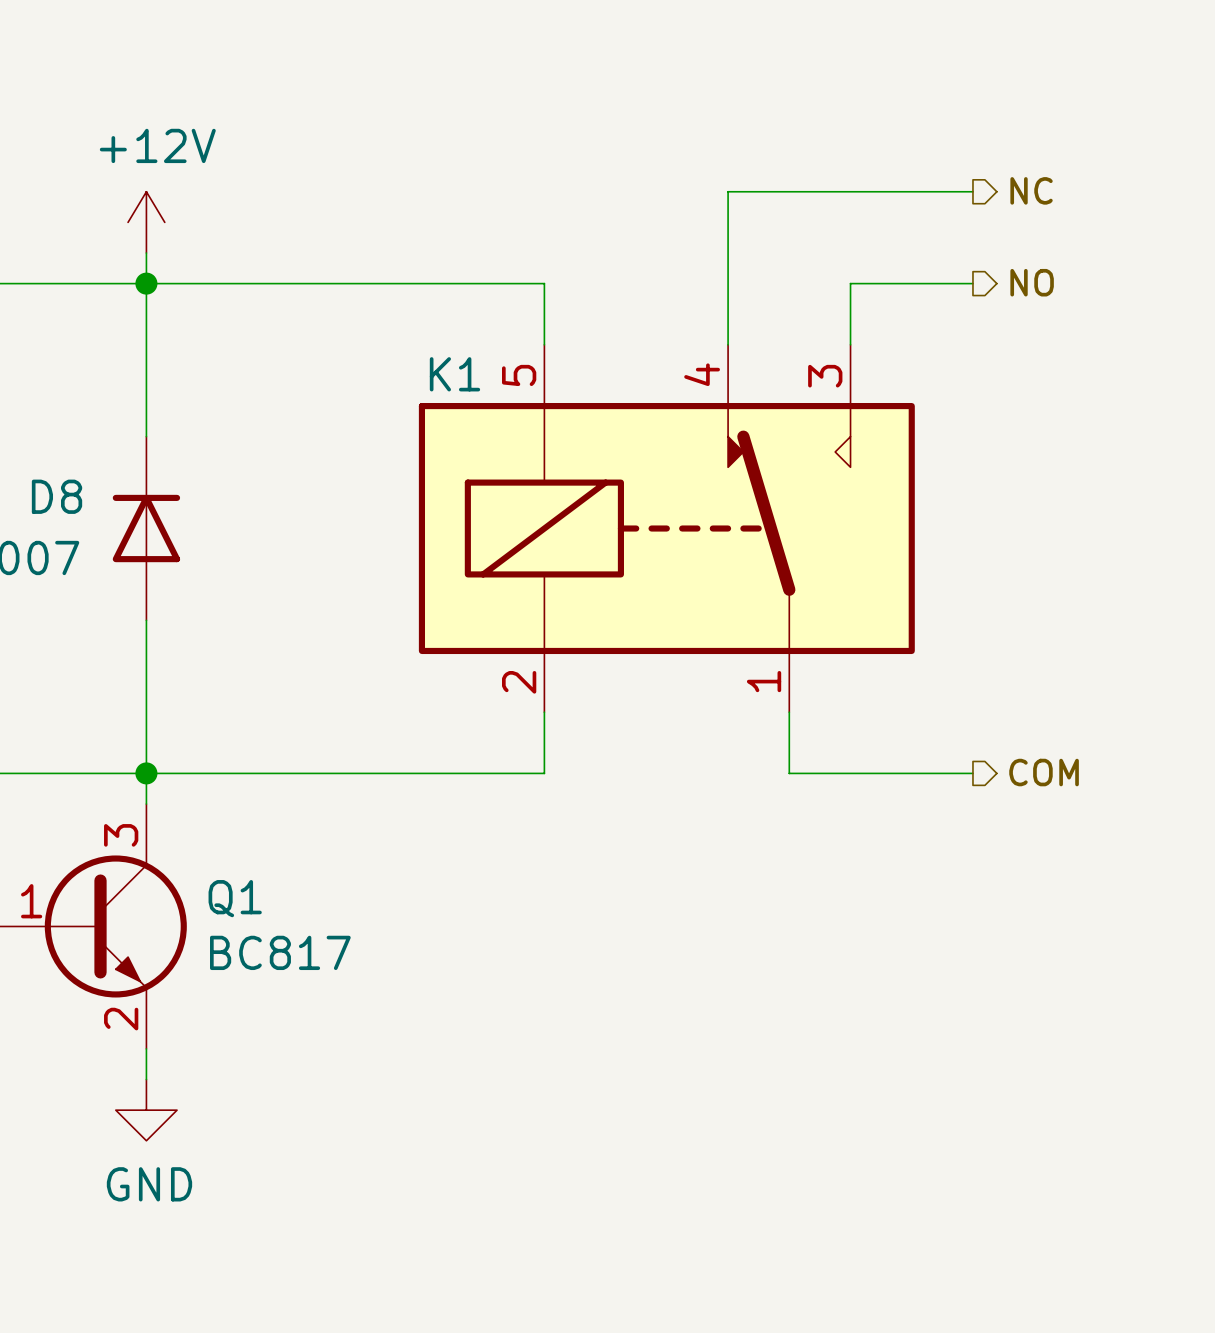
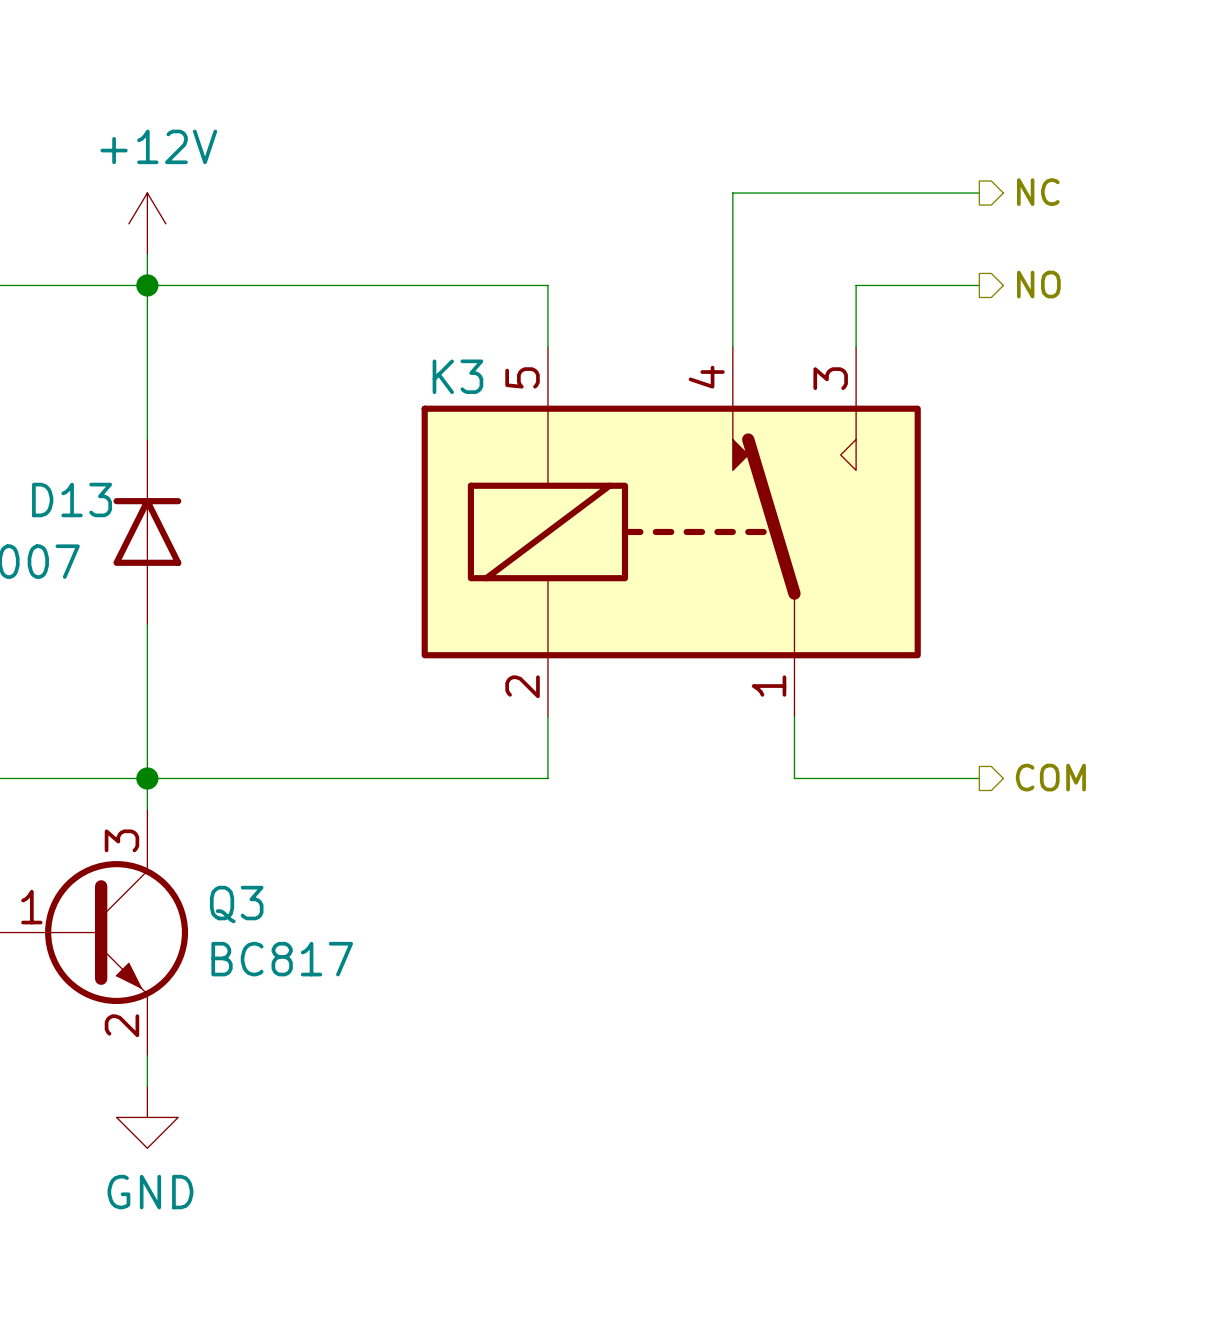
K1 name: K1 (454, 374) -> K3 (457, 376)
D8 name: D8 (57, 496) -> D13 (72, 500)
Q1 name: Q1 (235, 898) -> Q3 (236, 904)

